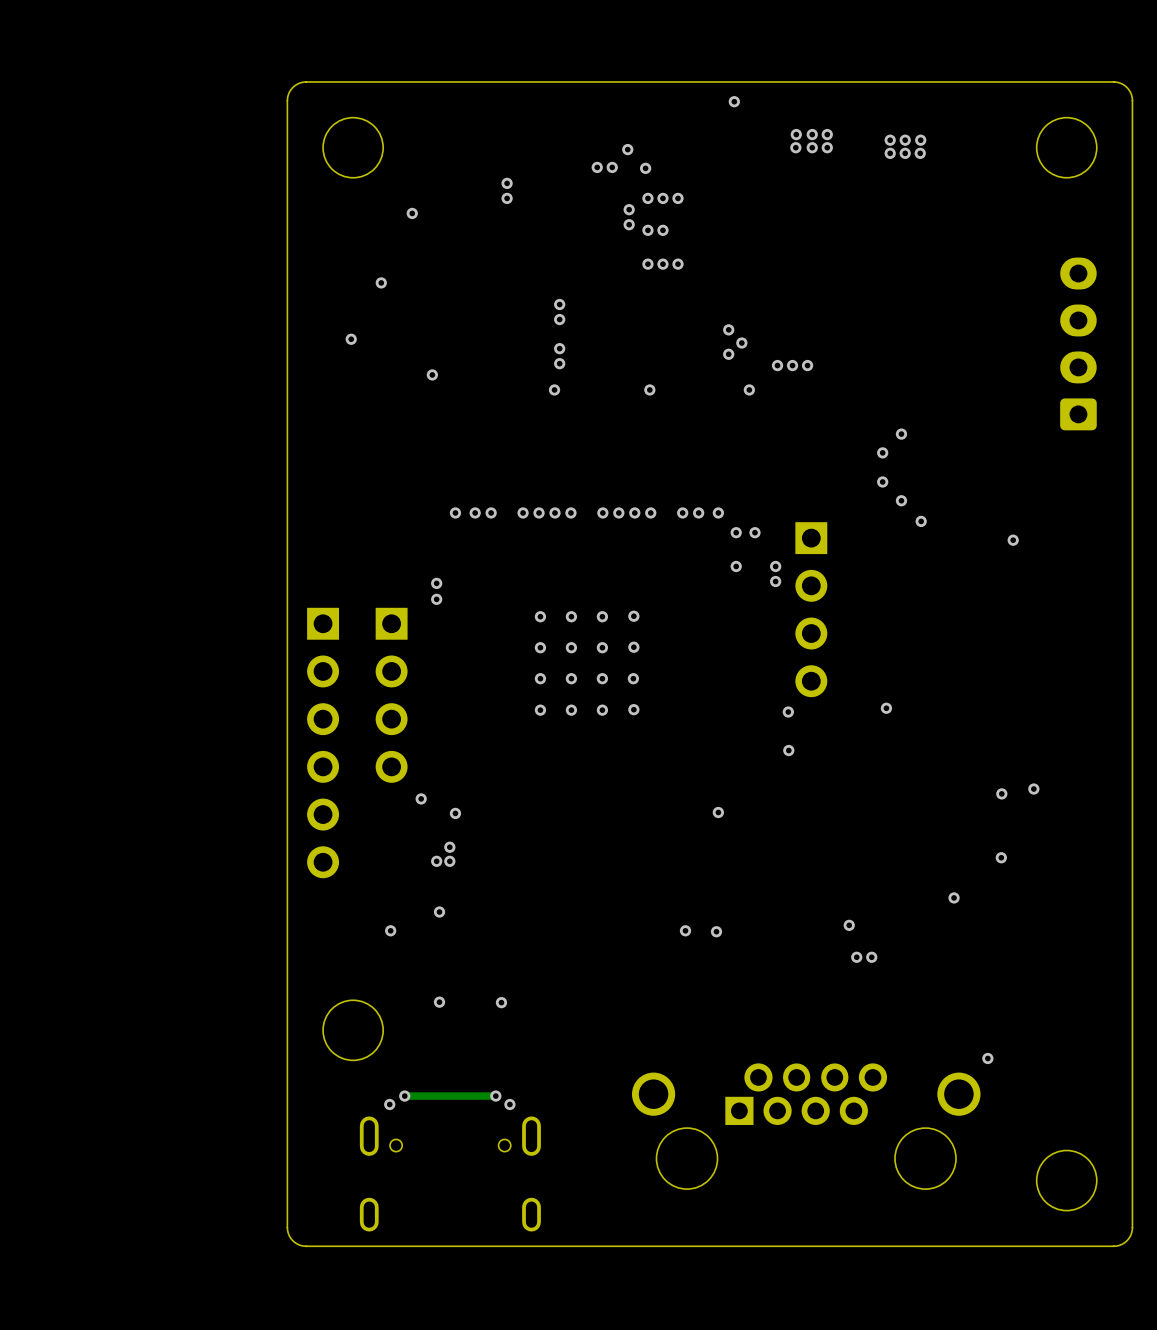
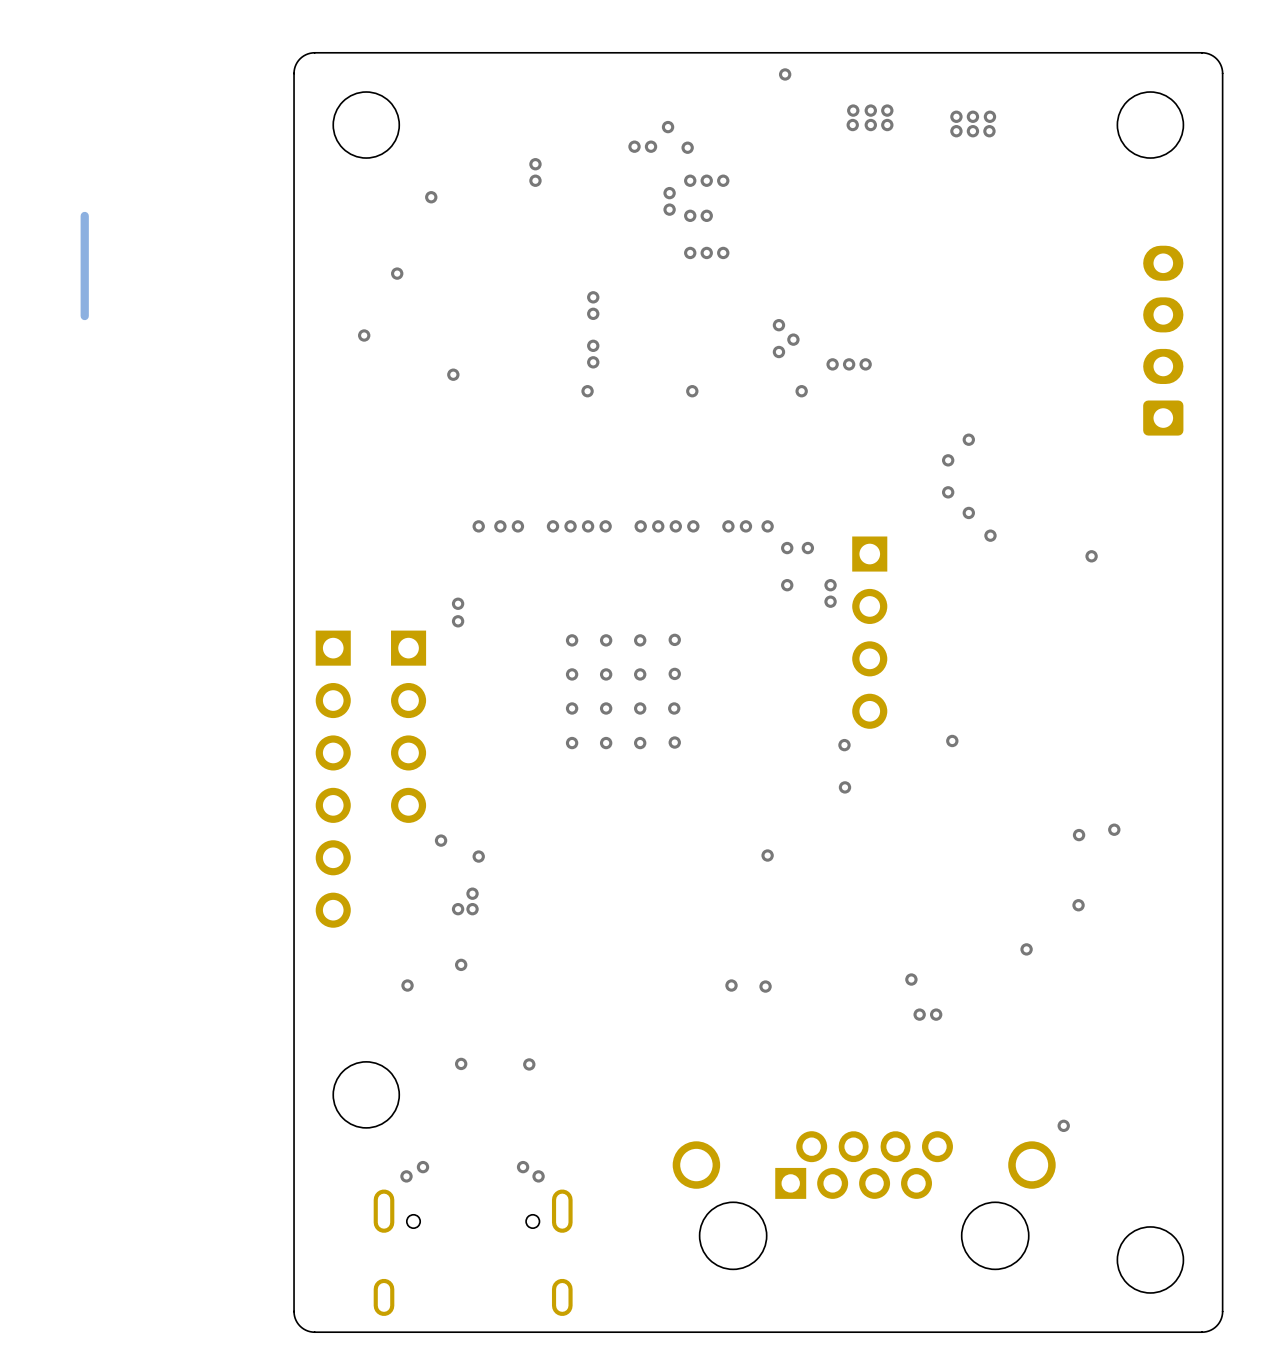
track: none -> (84, 215) (84, 316)
track: (495, 1096) (404, 1096) -> none

